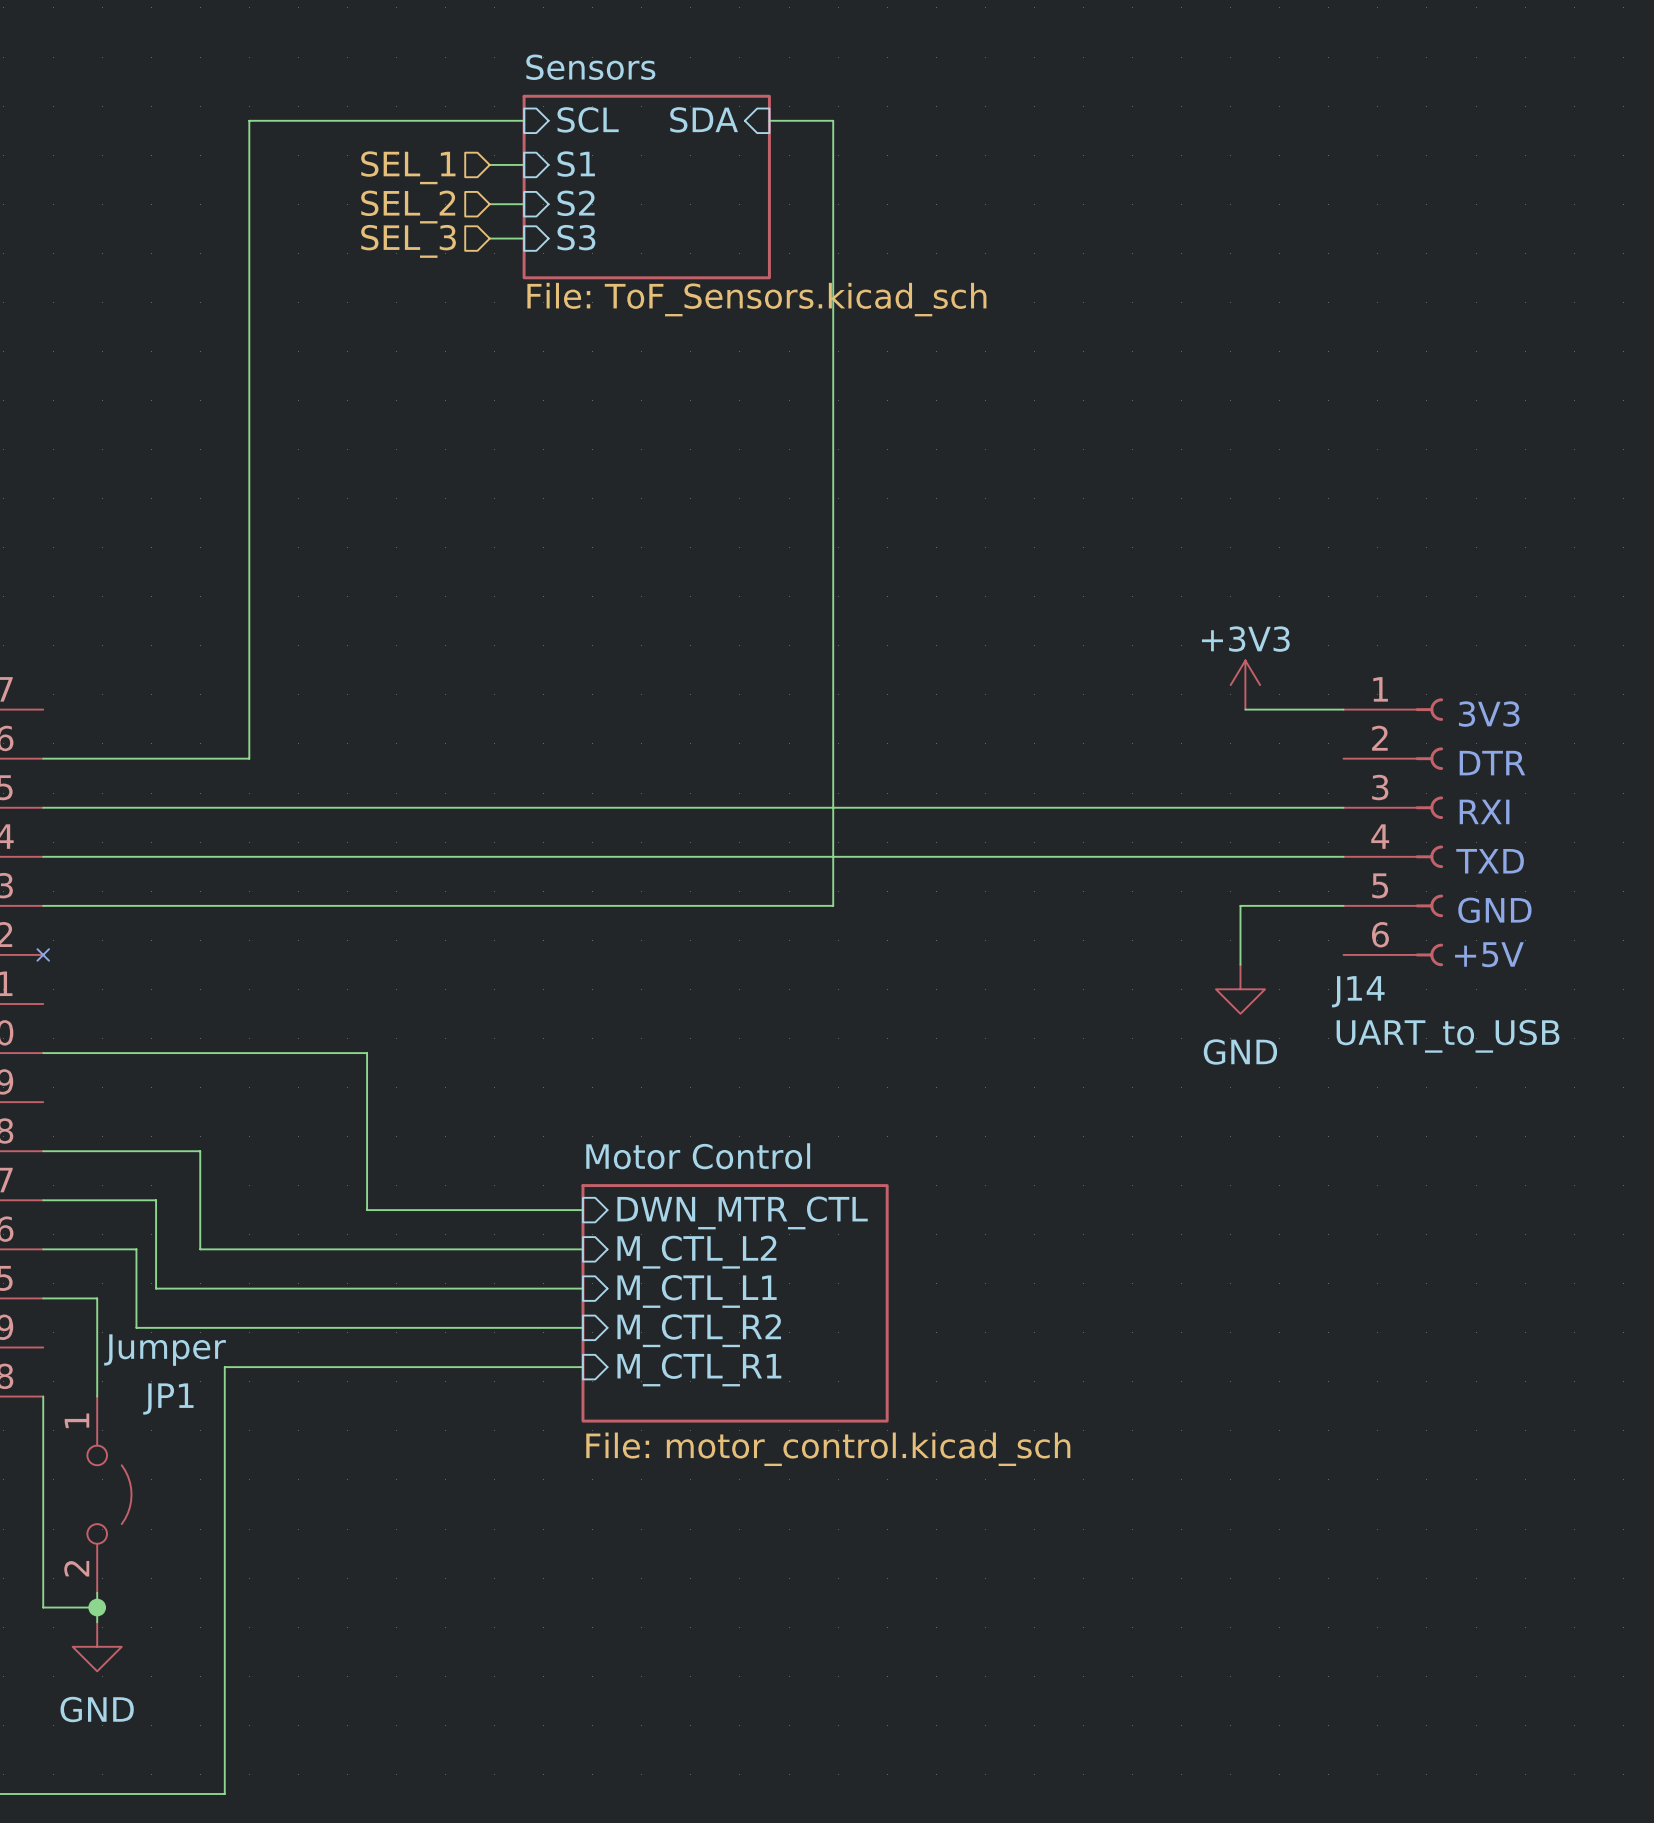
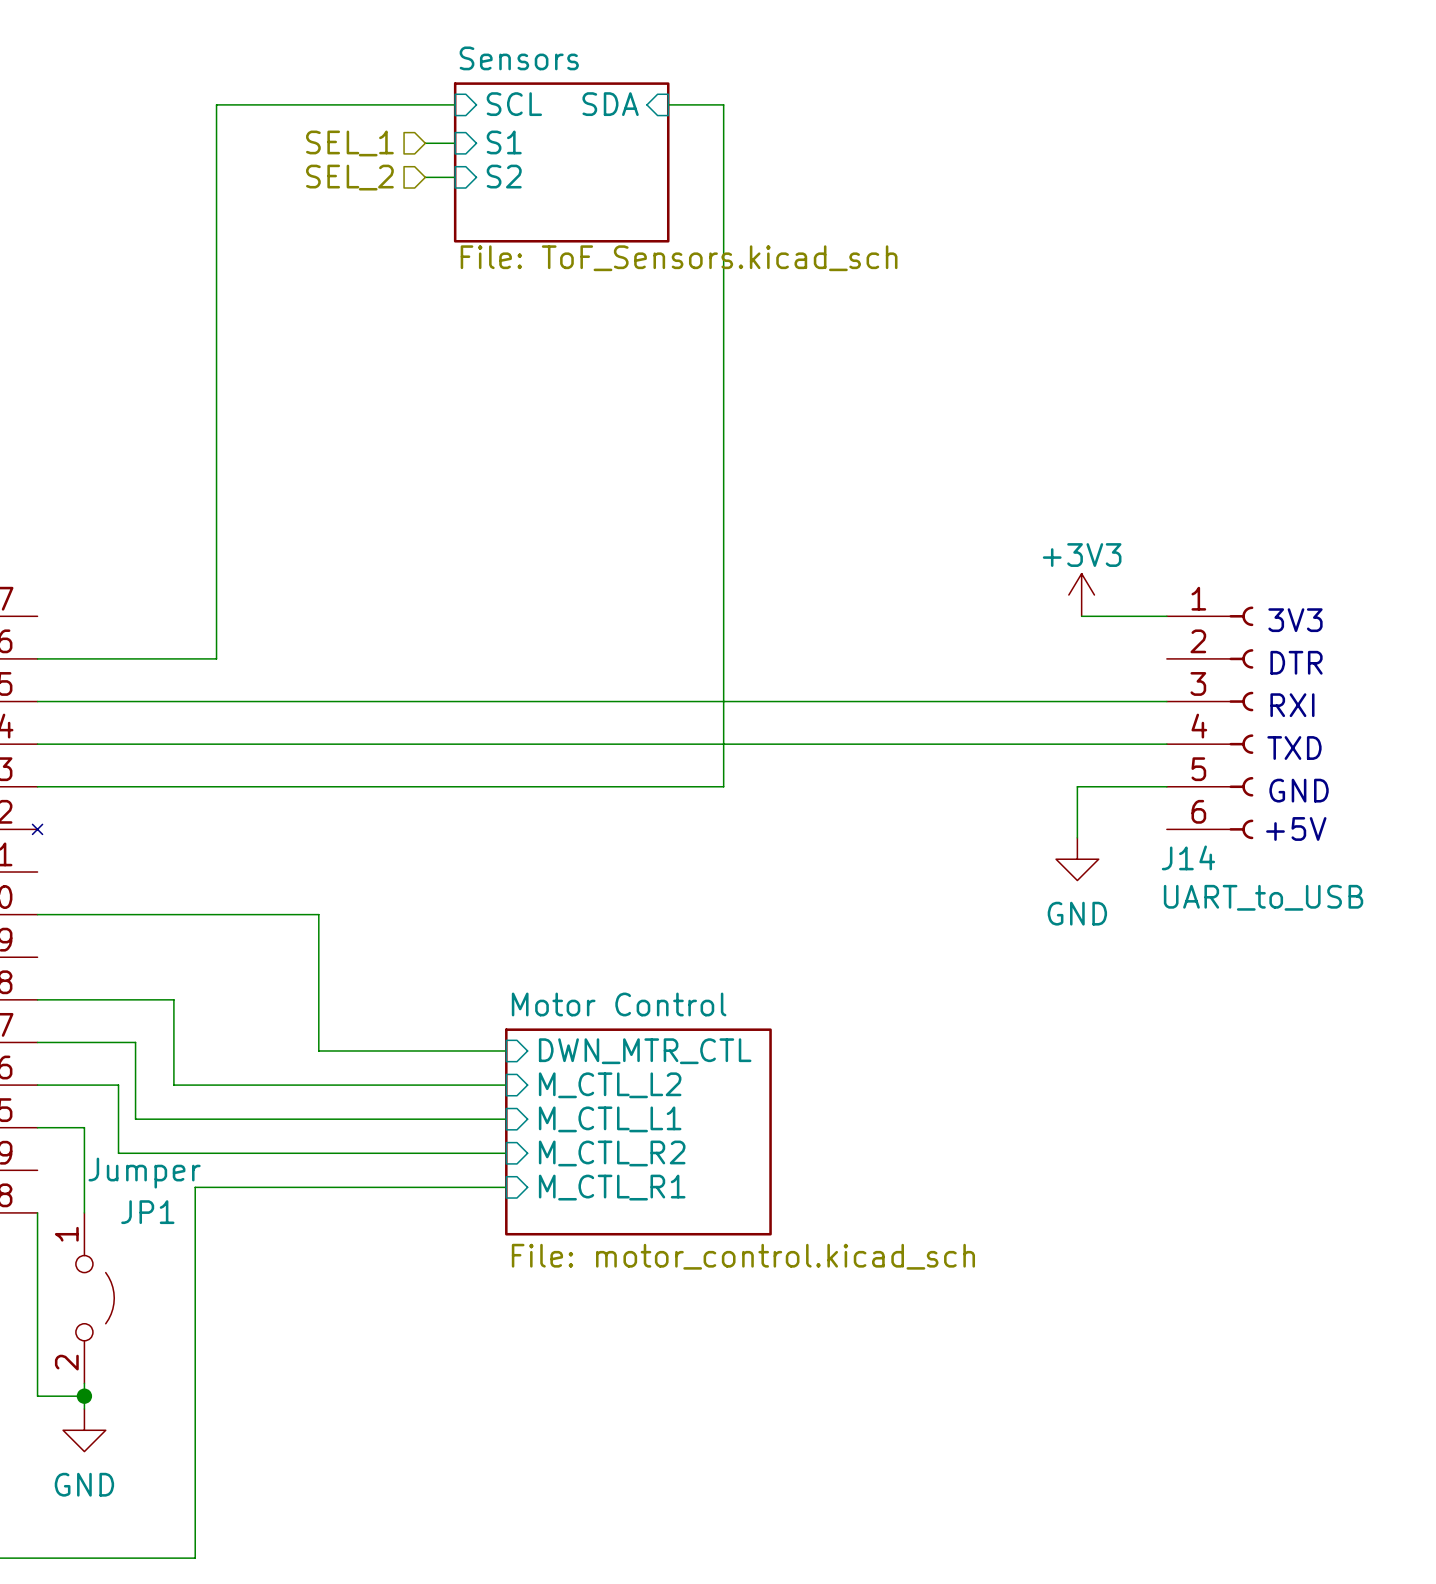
sheet pin: S3 (576, 237) -> none
wire: (489, 238) (524, 238) -> none
hierarchical label: SEL_3 (408, 241) -> none

